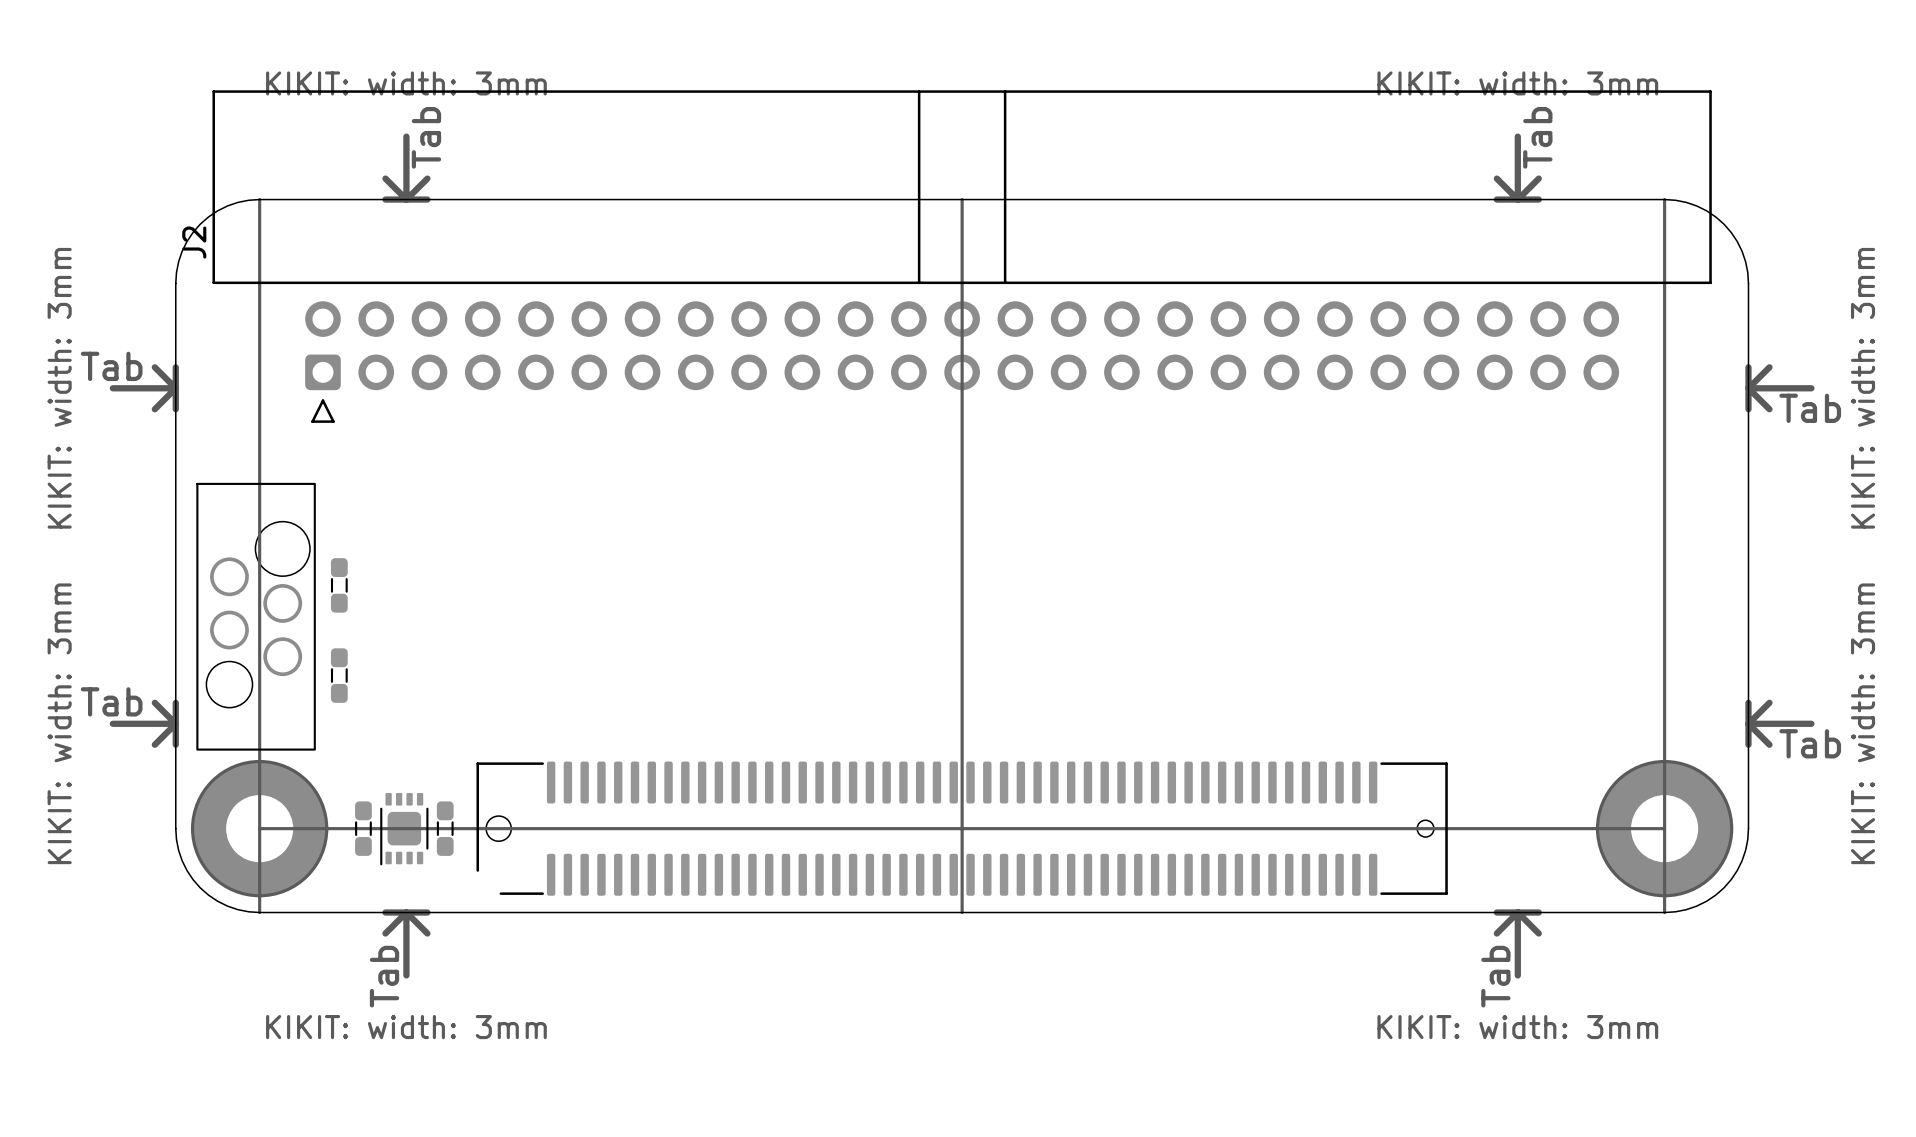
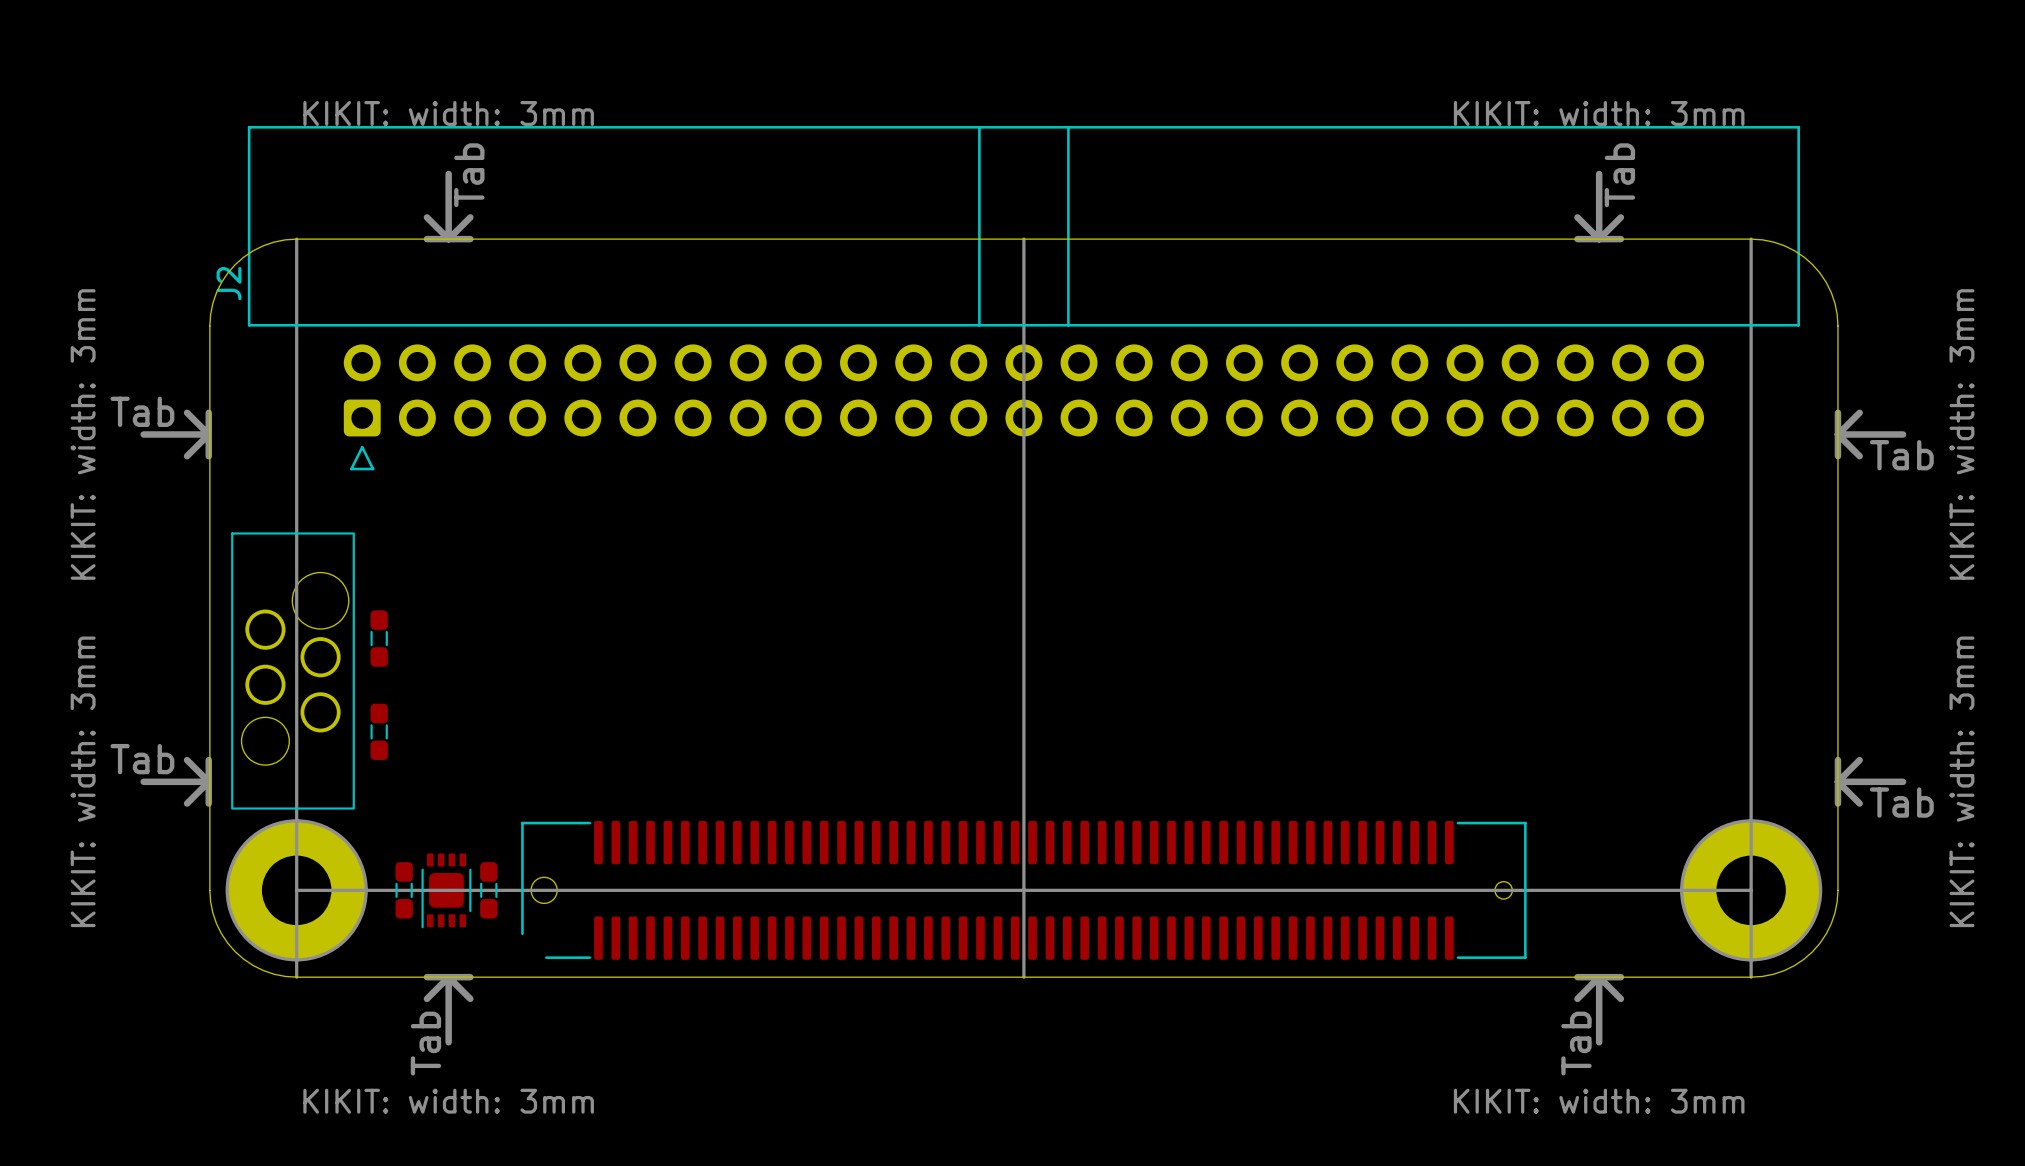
drawing shape: [266, 71, 547, 203] -> [303, 101, 594, 243]
drawing shape: [1377, 71, 1659, 203] -> [1453, 101, 1745, 243]
drawing shape: [47, 247, 179, 529] -> [70, 289, 213, 580]
drawing shape: [1745, 247, 1876, 529] -> [1834, 289, 1975, 580]
drawing shape: [47, 583, 179, 865] -> [70, 636, 213, 928]
drawing shape: [1745, 583, 1876, 865] -> [1834, 636, 1975, 928]
drawing shape: [266, 909, 547, 1040] -> [303, 973, 594, 1114]
drawing shape: [1377, 909, 1659, 1040] -> [1453, 973, 1745, 1114]

